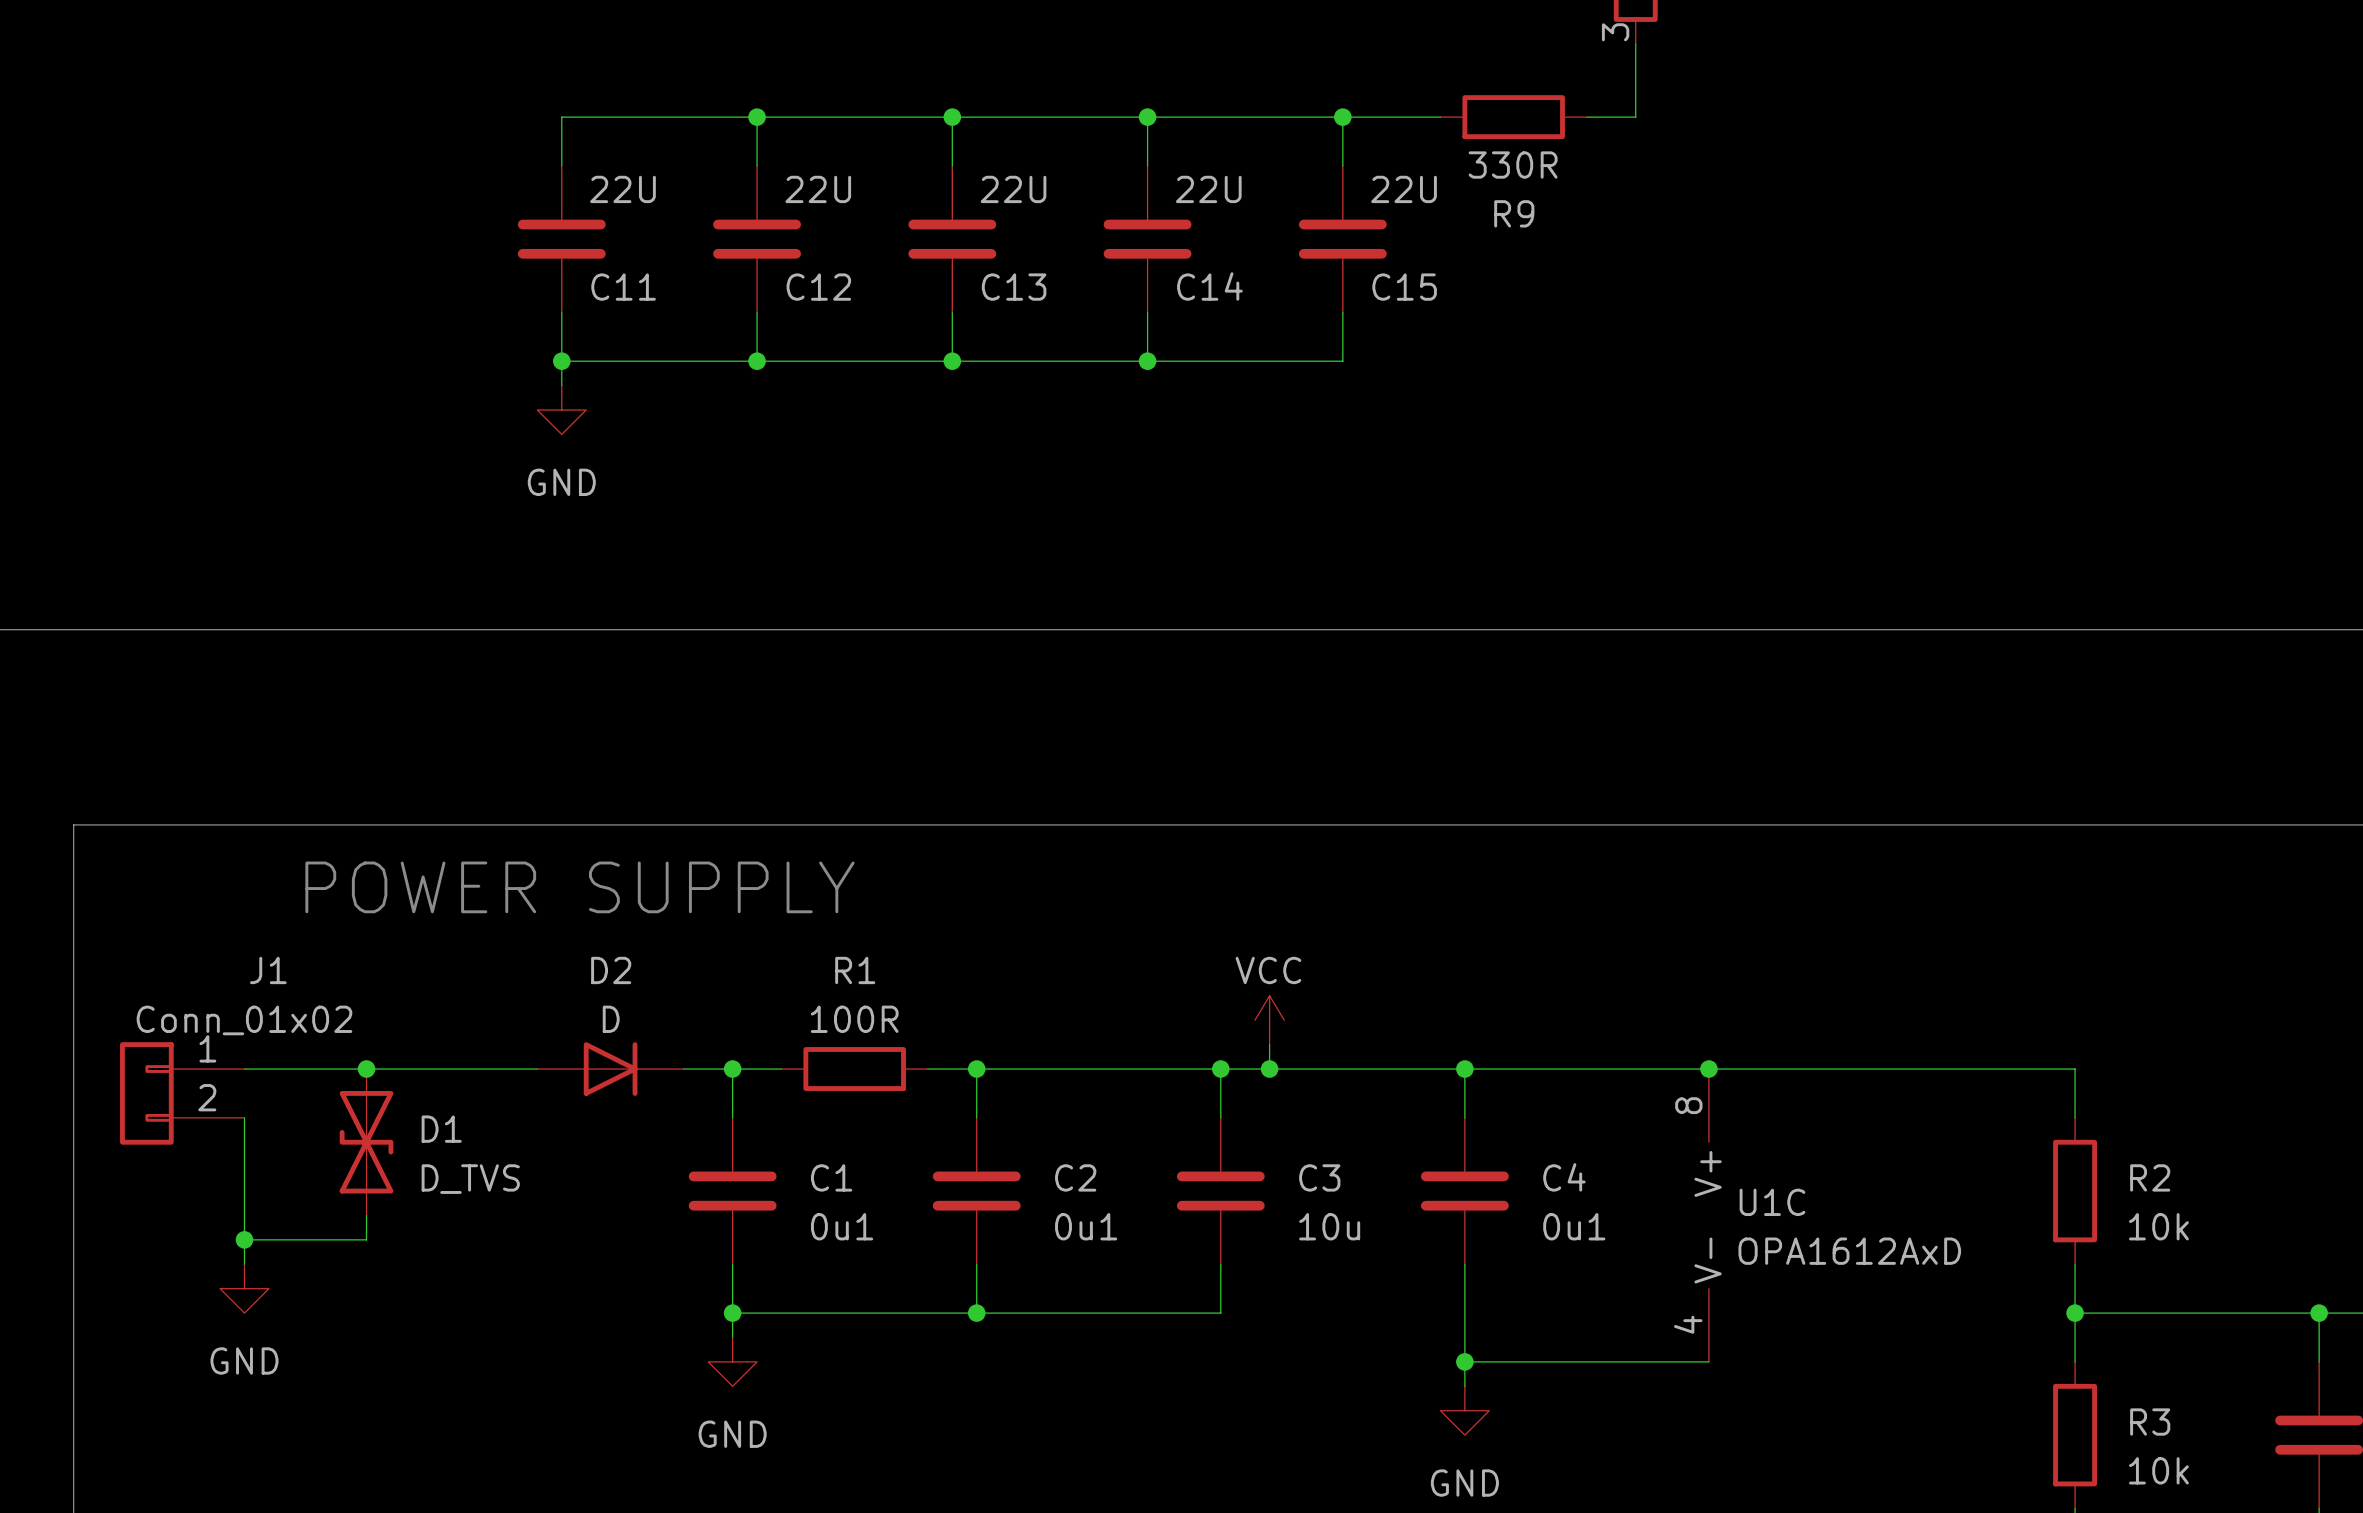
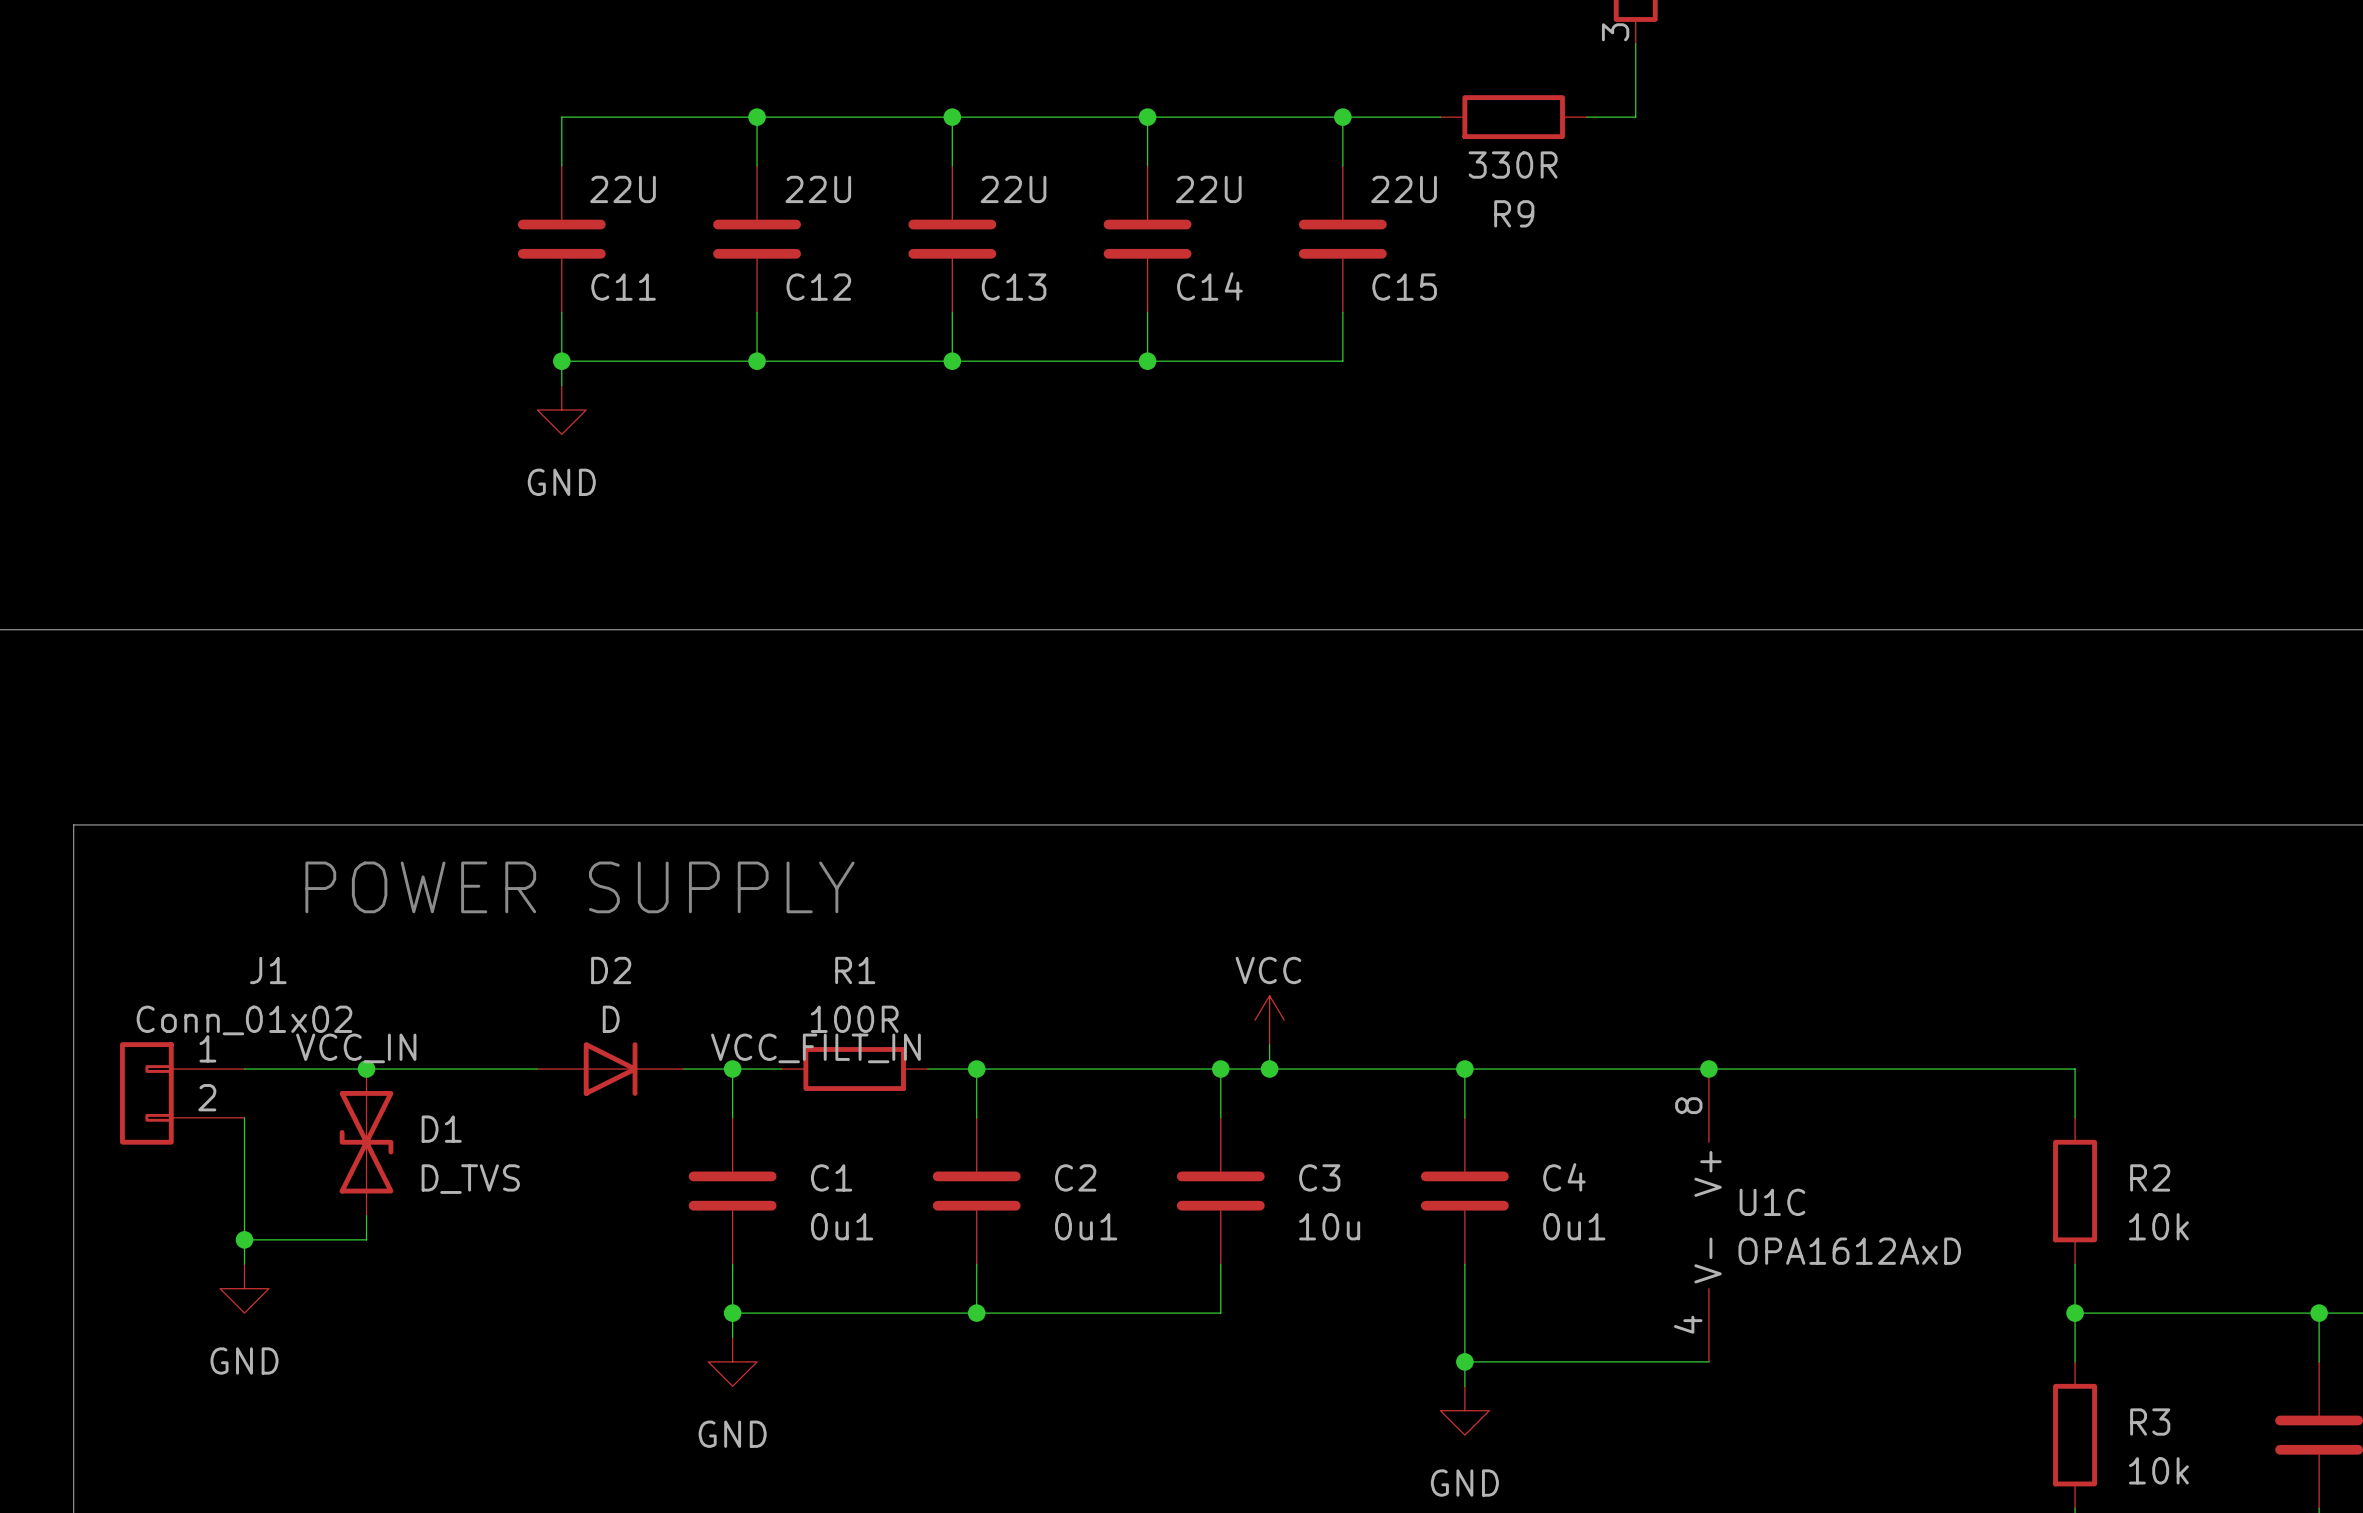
label: none -> VCC_IN (356, 1048)
label: none -> VCC_FILT_IN (815, 1048)

